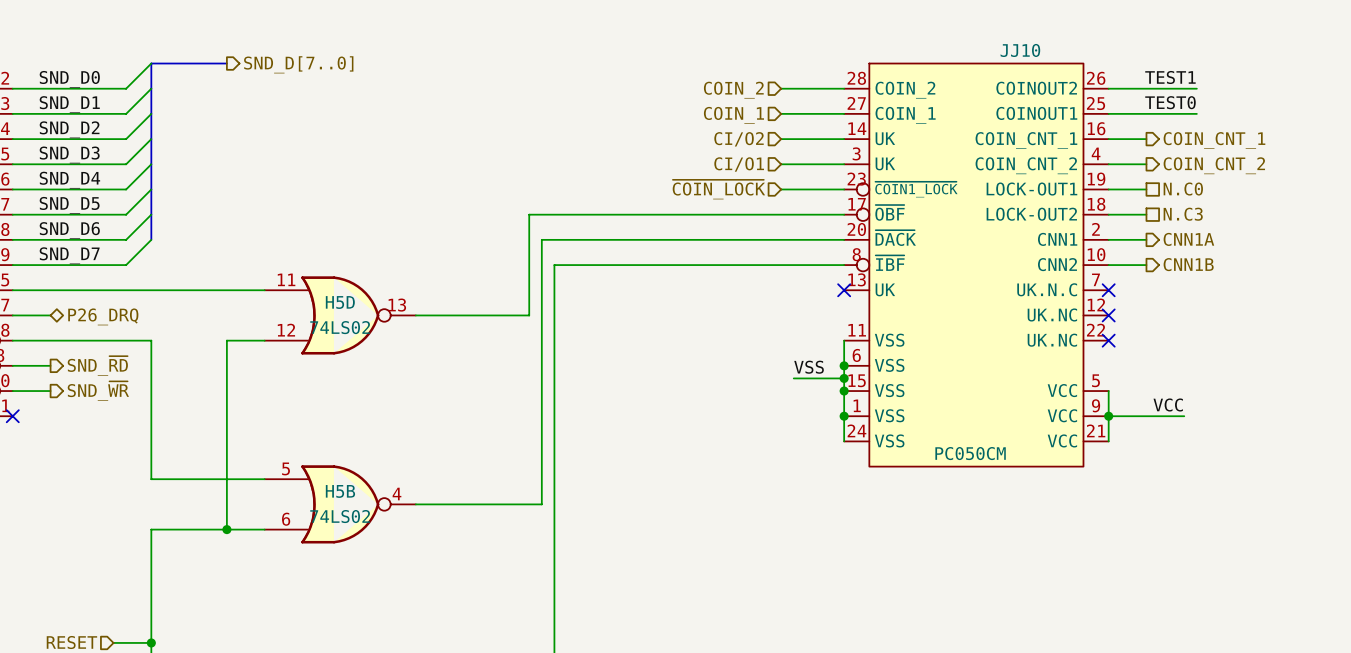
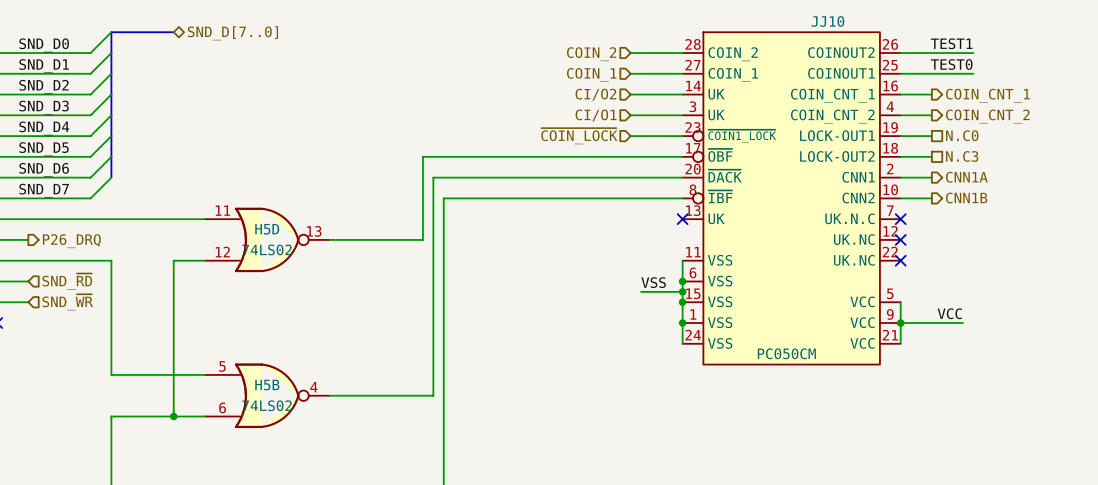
hierarchical label shape: output (298, 64) -> bidirectional (232, 33)
hierarchical label shape: bidirectional (103, 316) -> output (71, 241)
hierarchical label shape: output (97, 365) -> input (67, 281)
hierarchical label shape: output (98, 391) -> input (67, 302)

